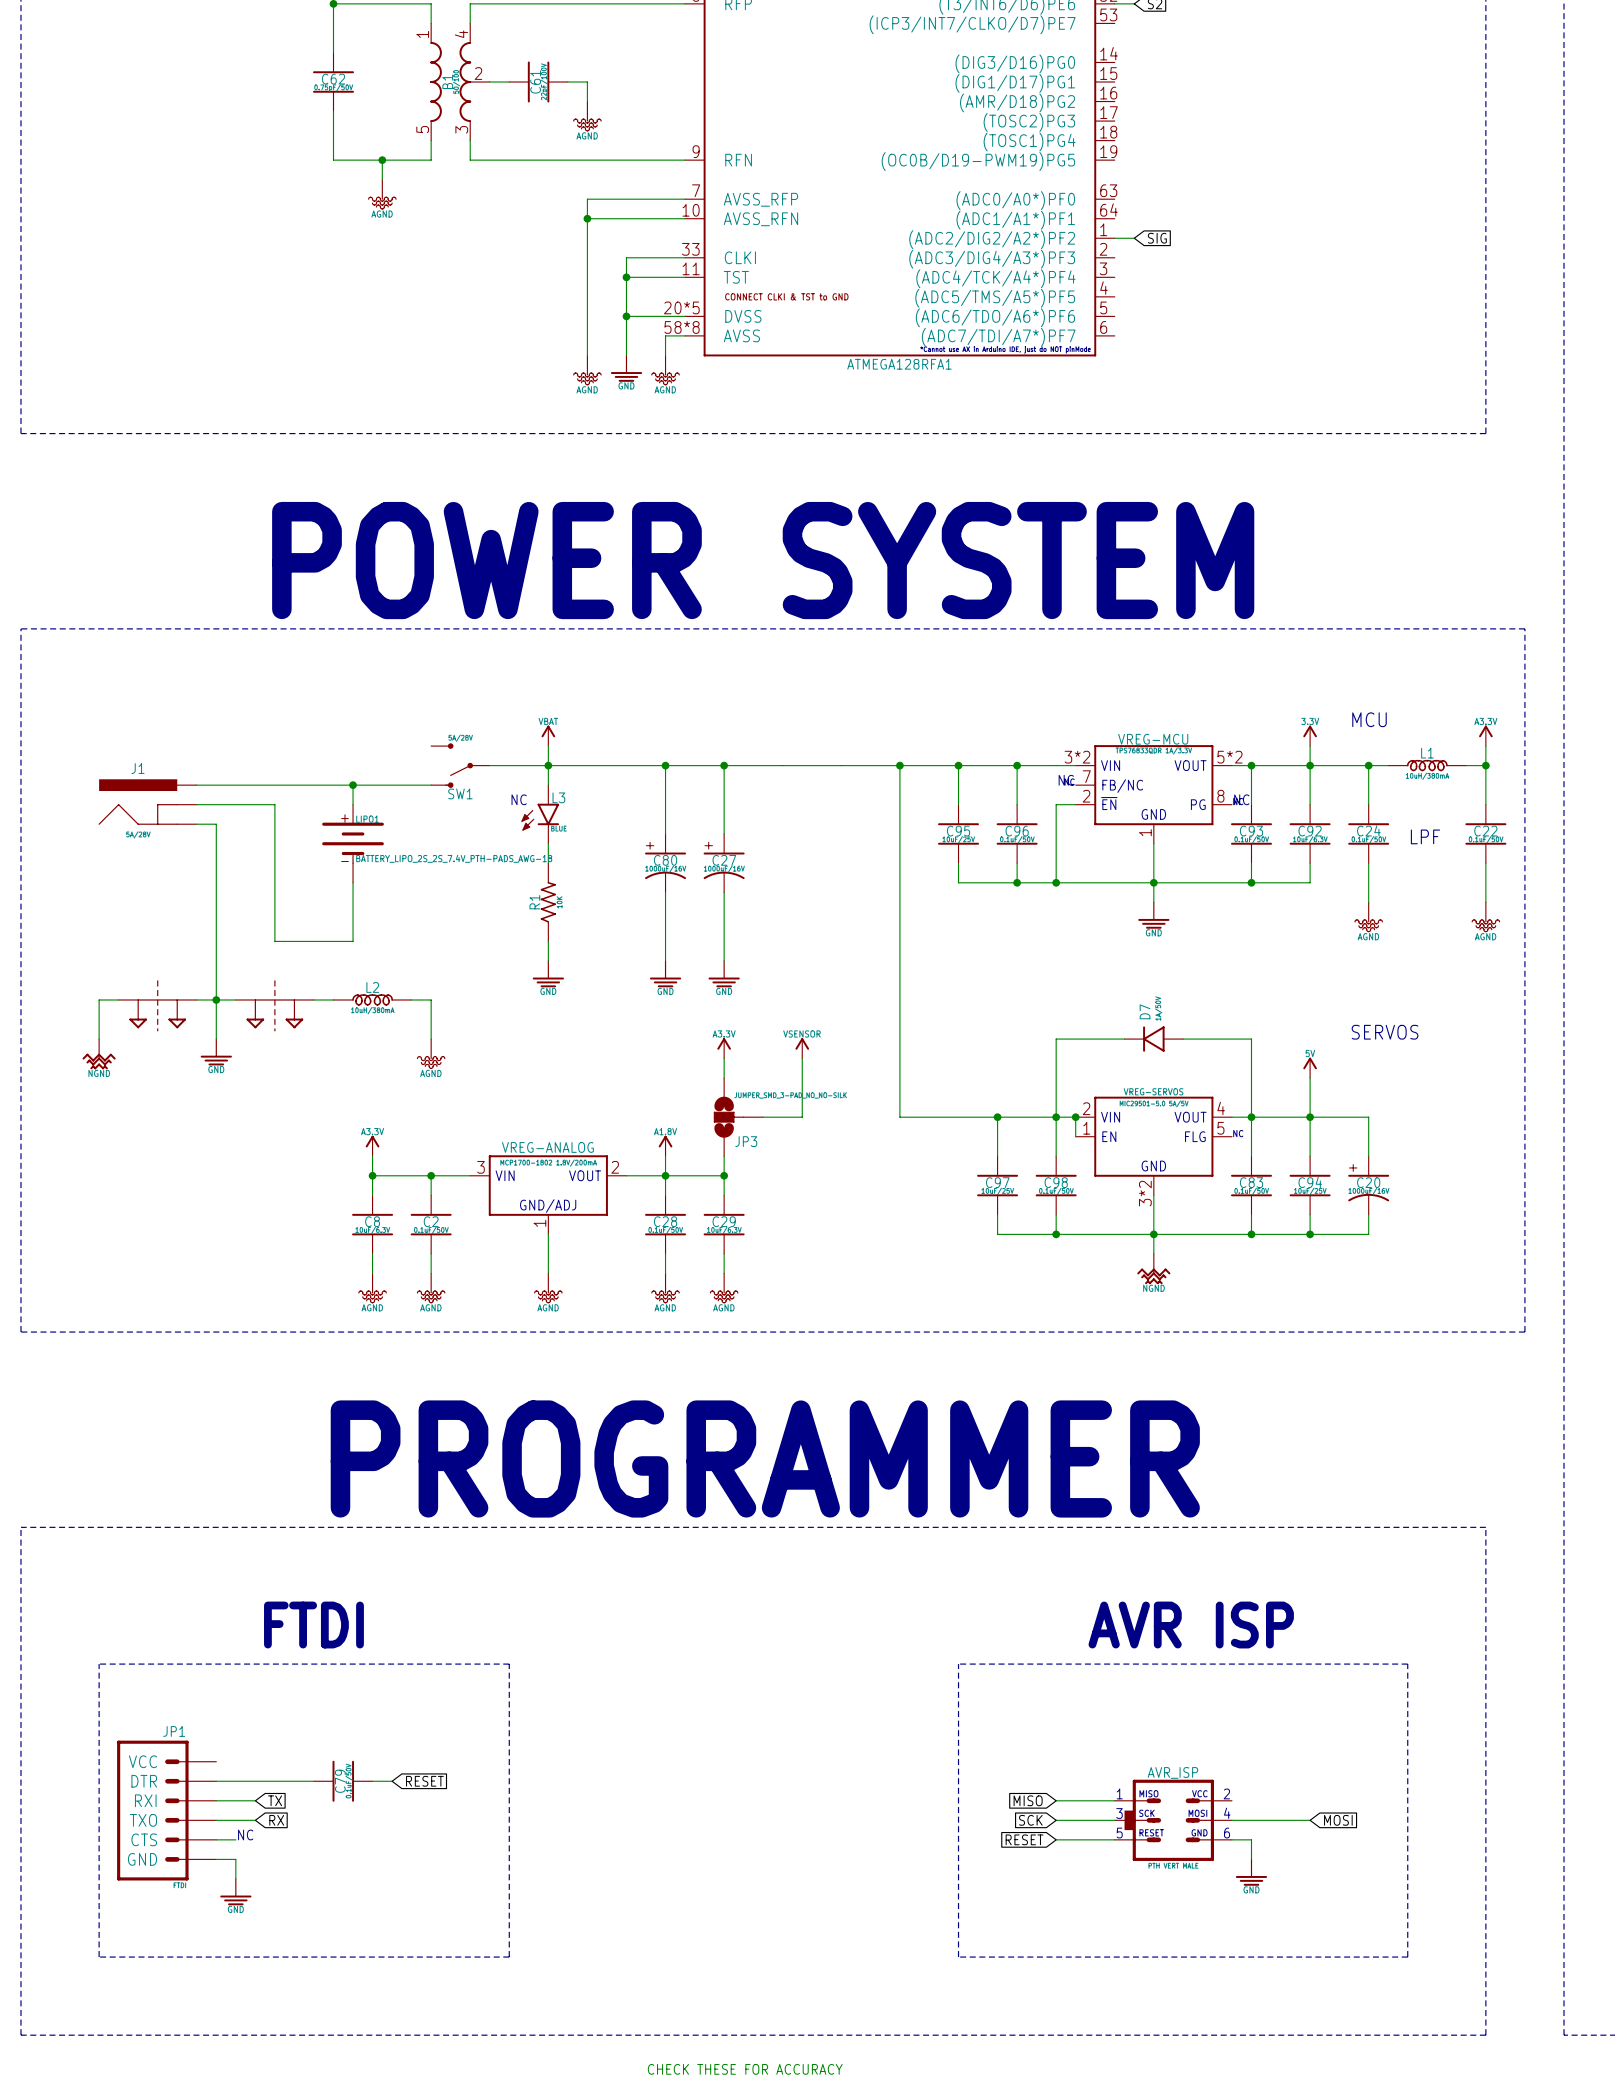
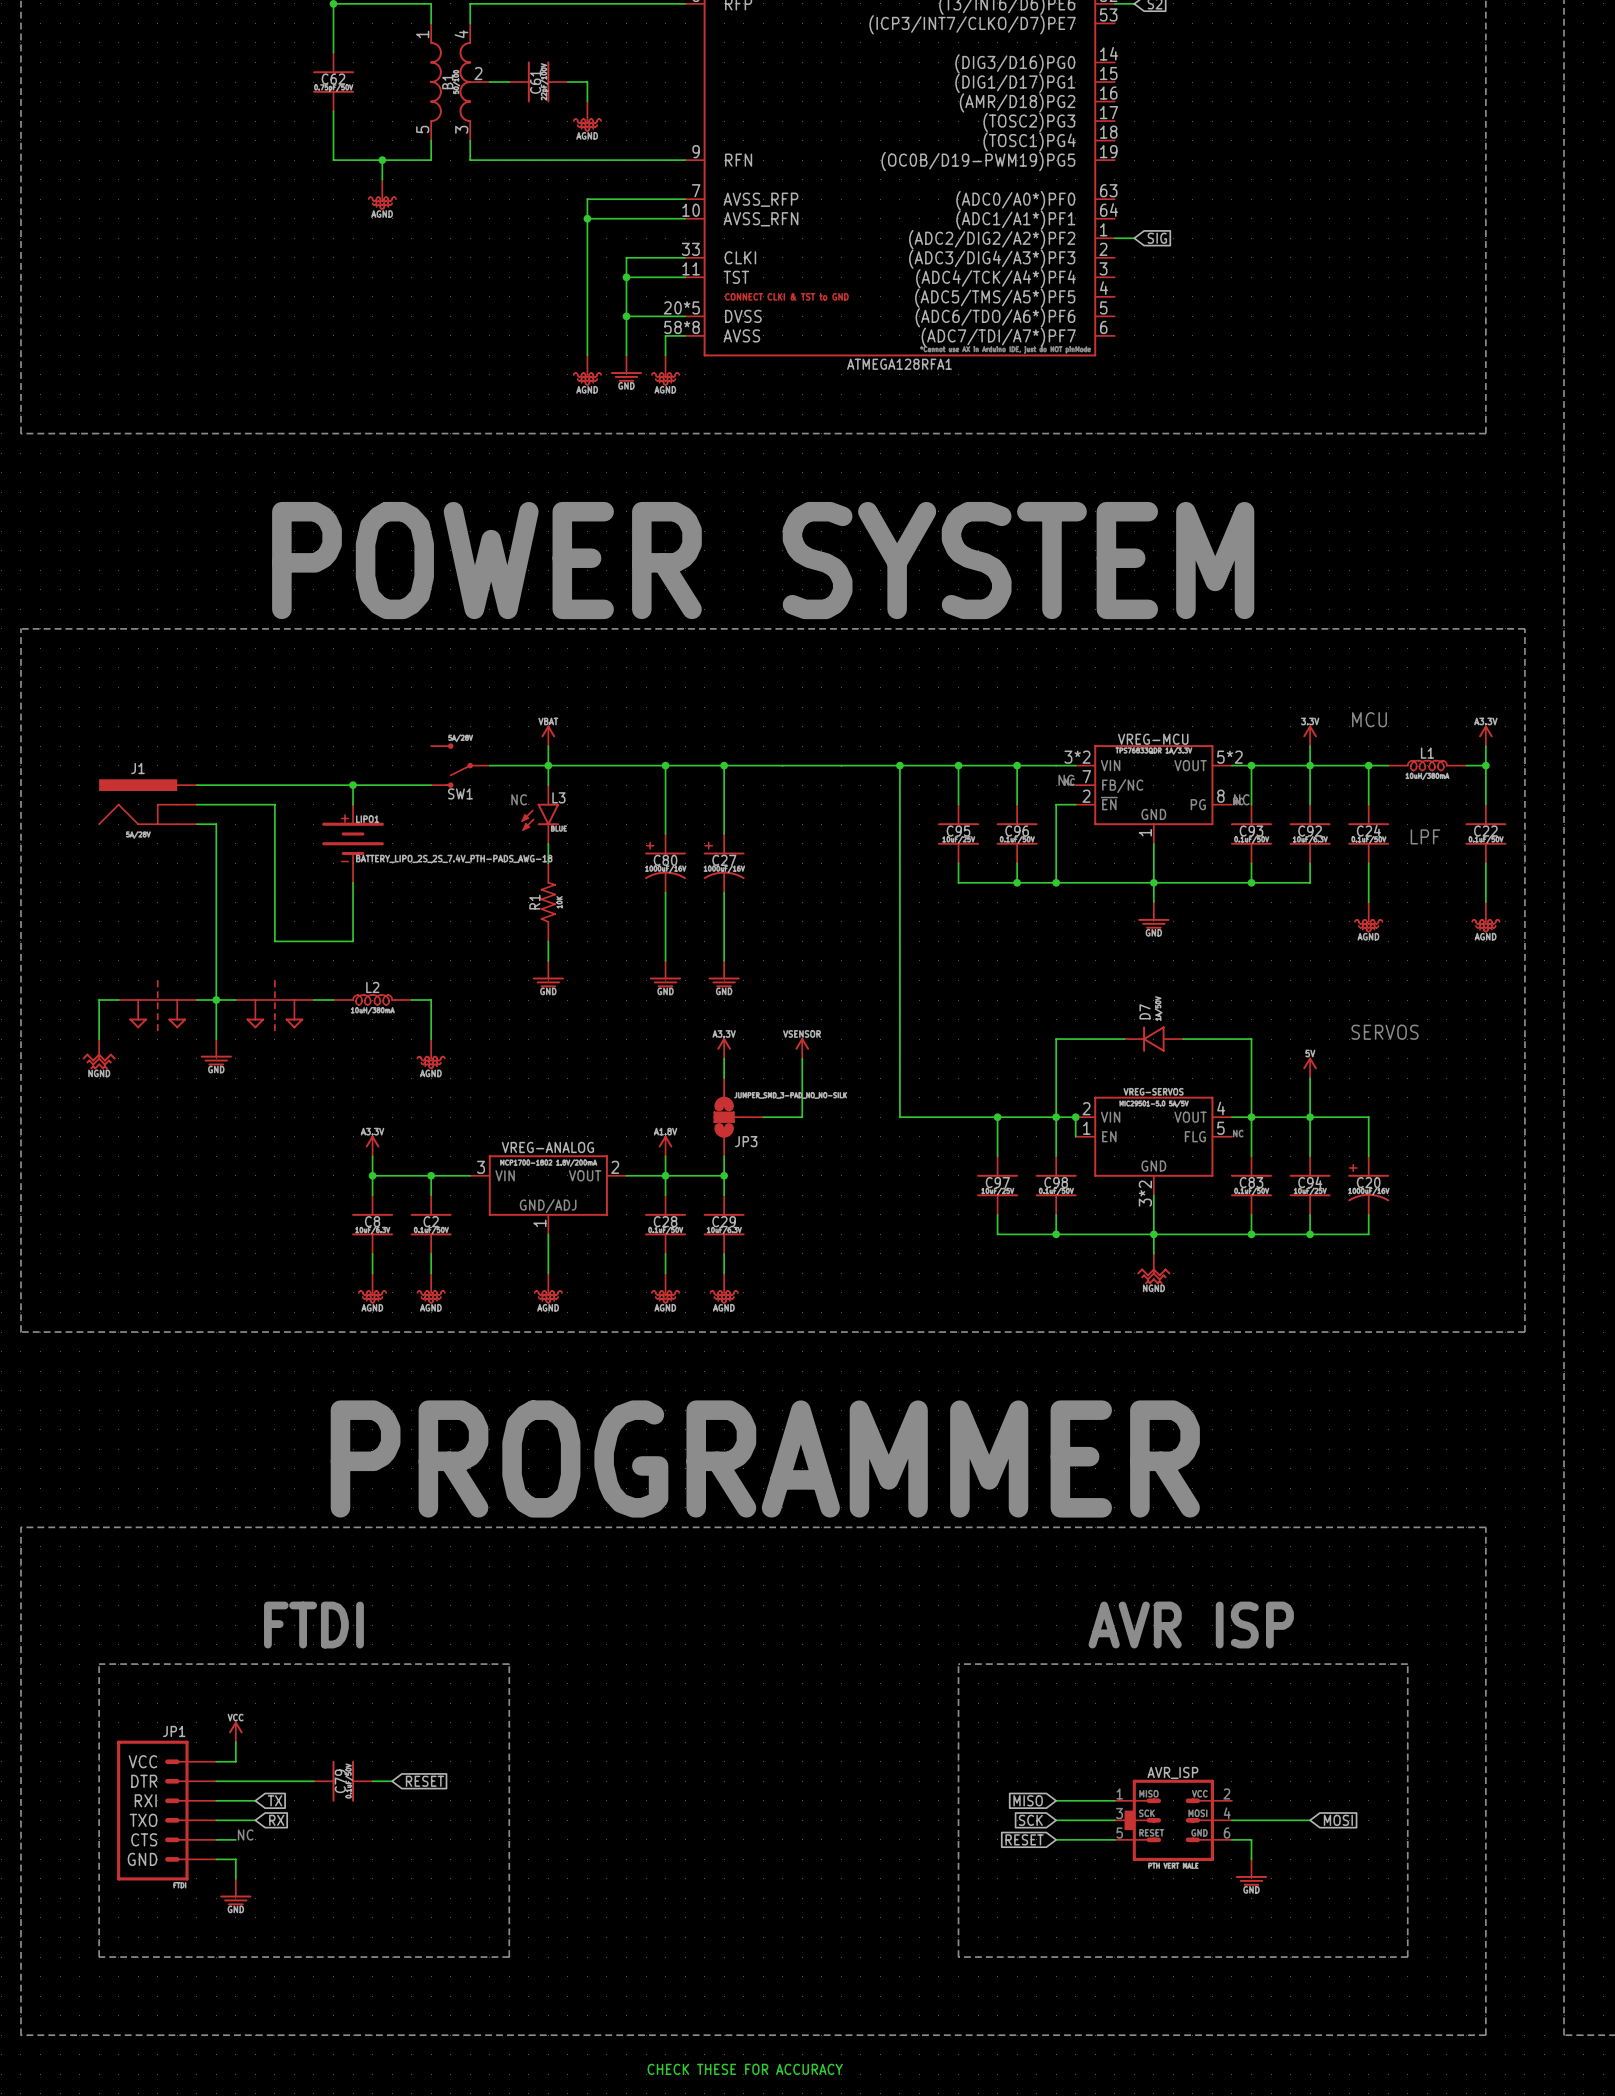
power symbol: none -> (235, 1731)
wire: none -> (235, 1742) (235, 1761) (216, 1761)

